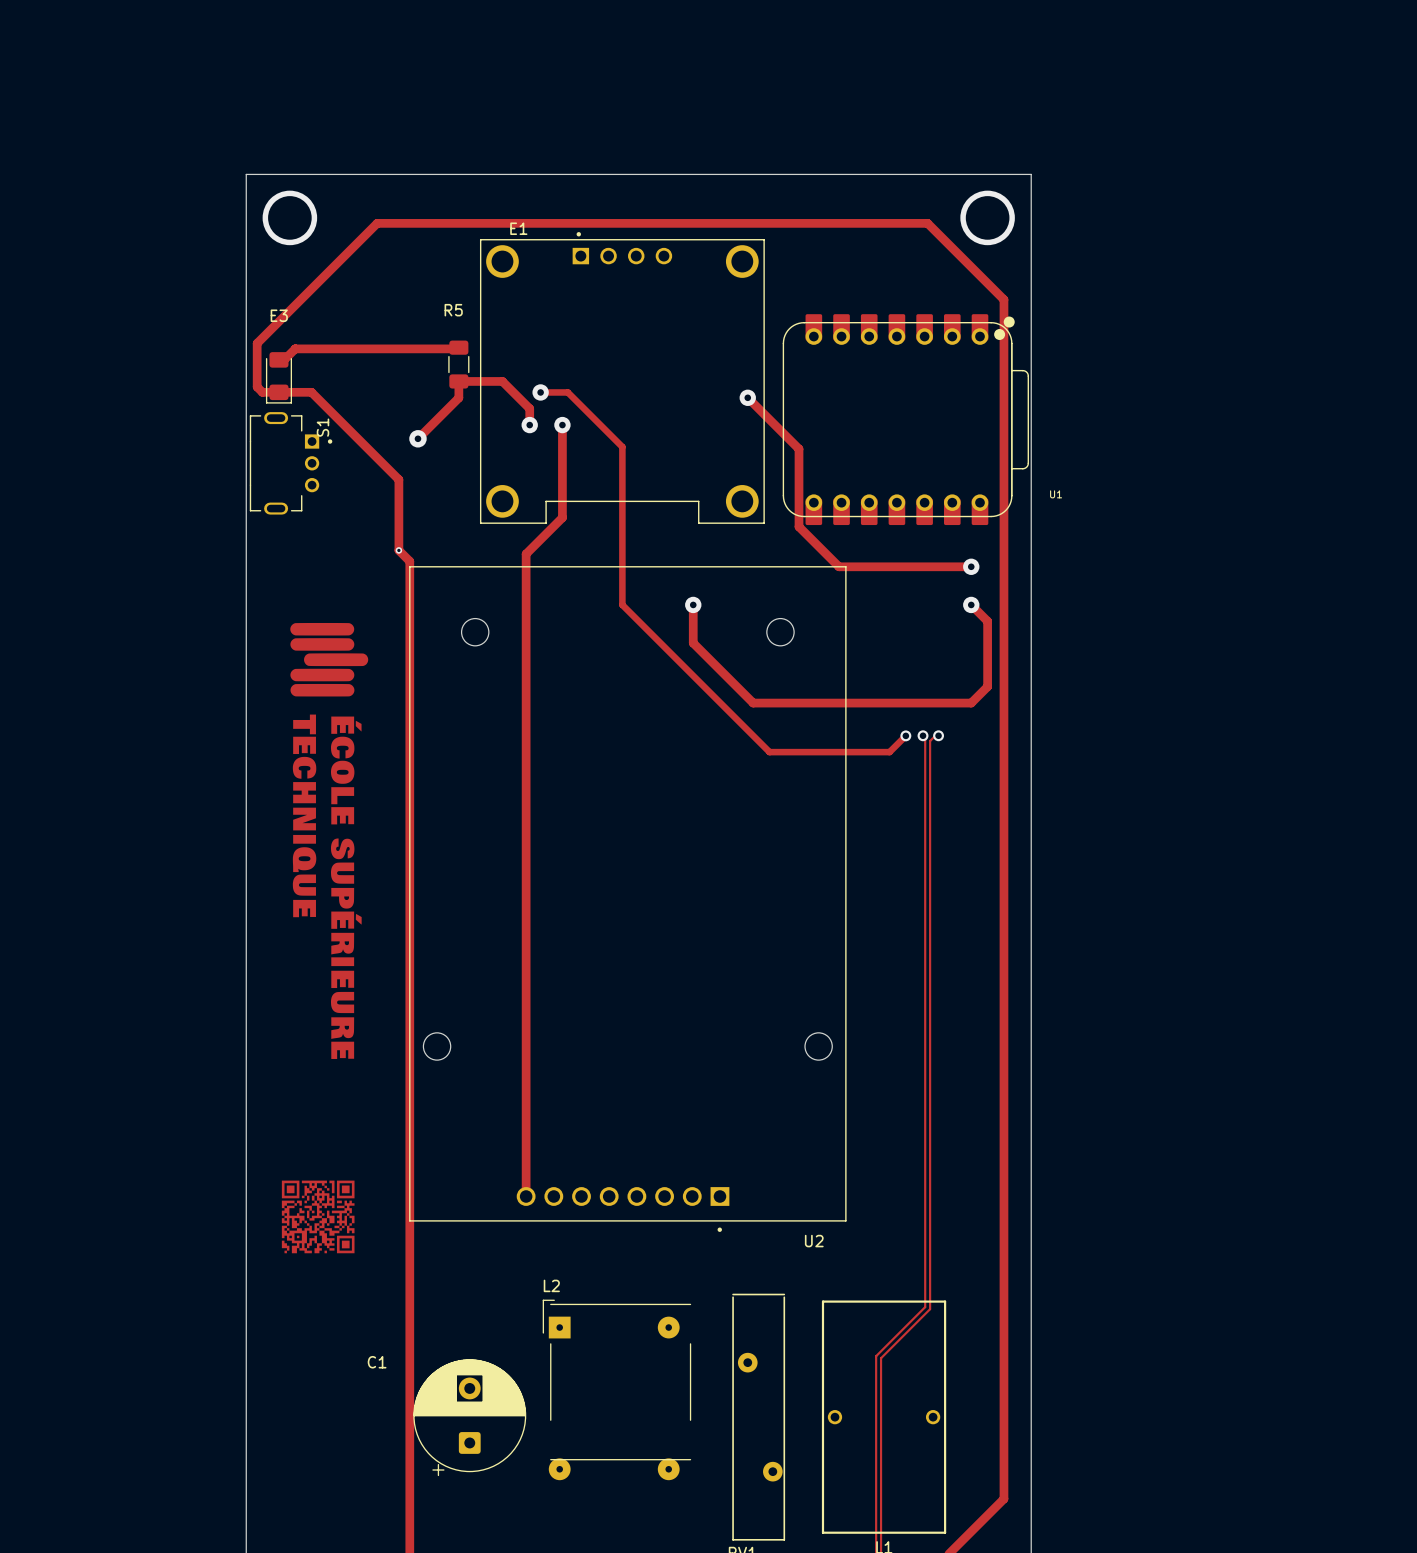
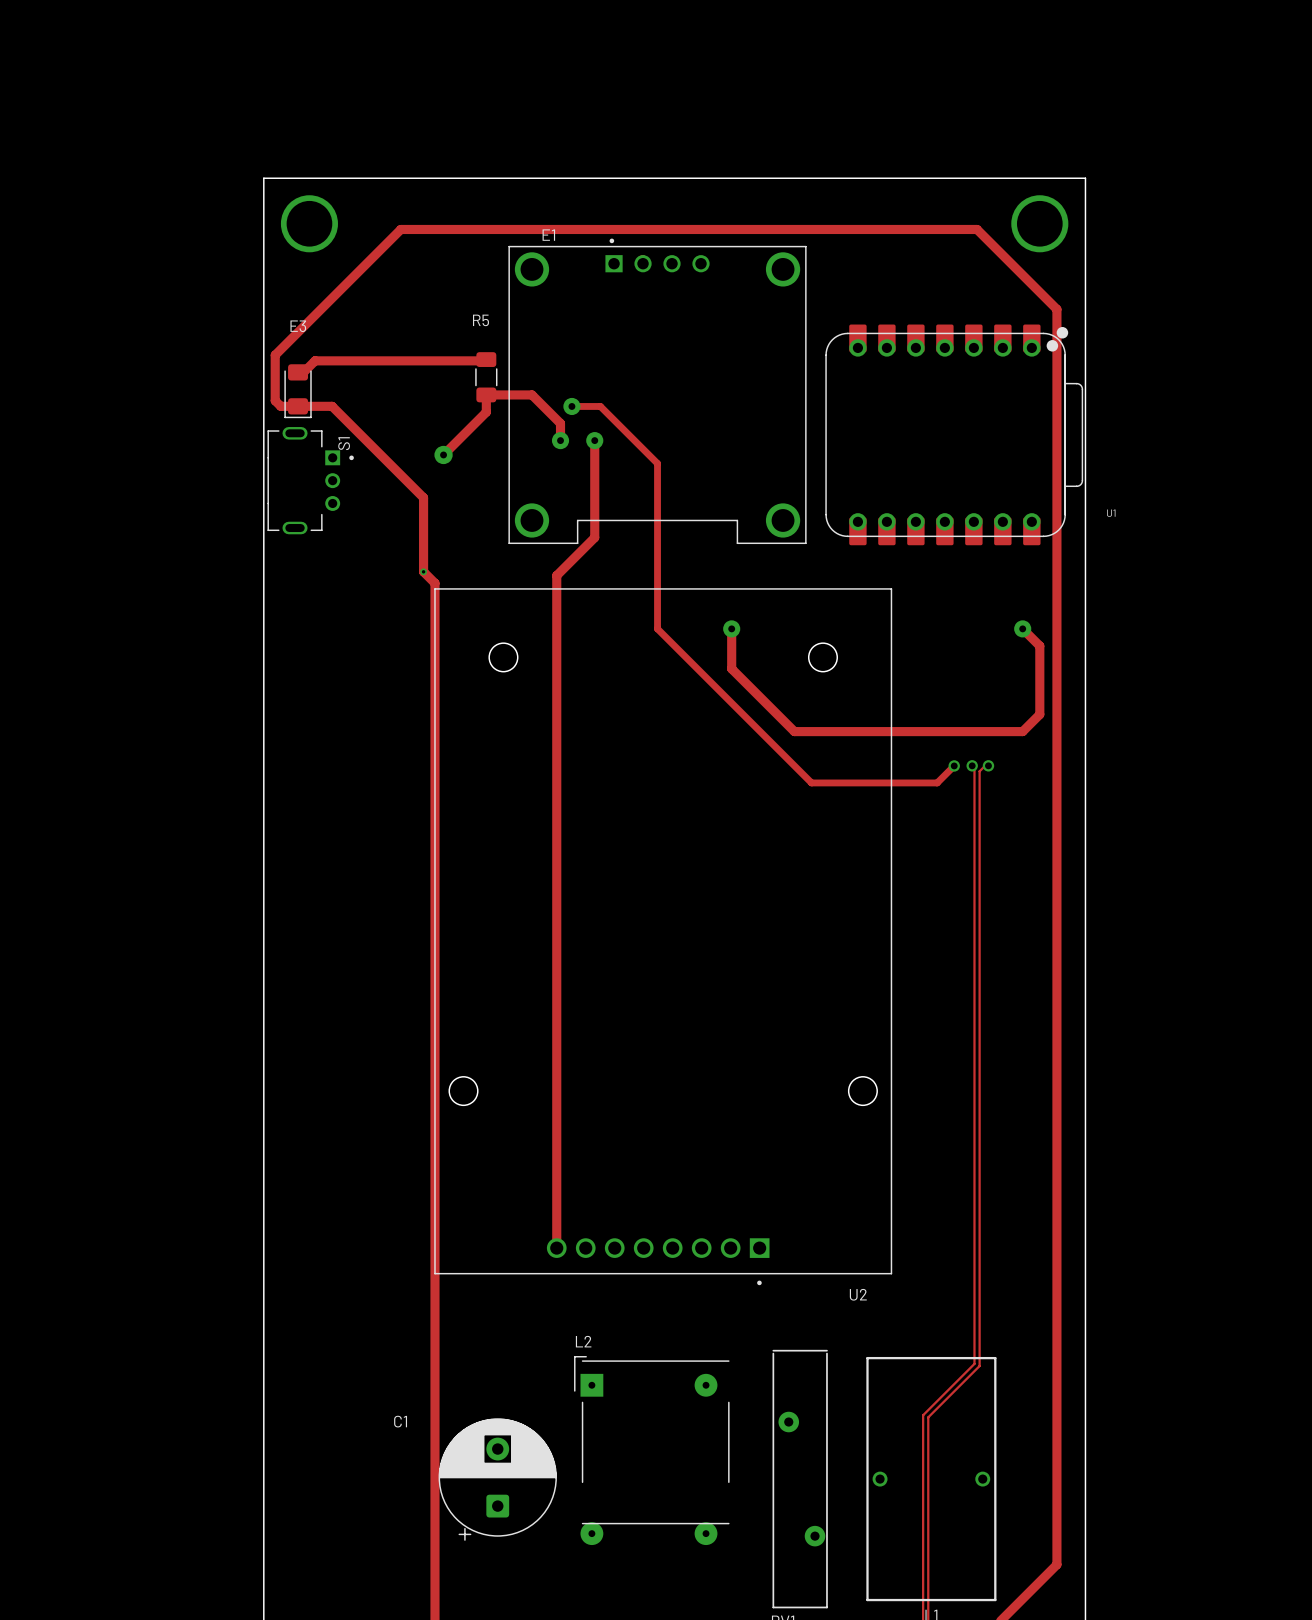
track: (747, 397) (799, 449) (799, 526) (838, 566) (971, 566) -> none
via: (747, 397) -> none
via: (971, 566) -> none
drawing: [290, 622, 369, 1059] -> none
drawing: [281, 1180, 355, 1254] -> none

